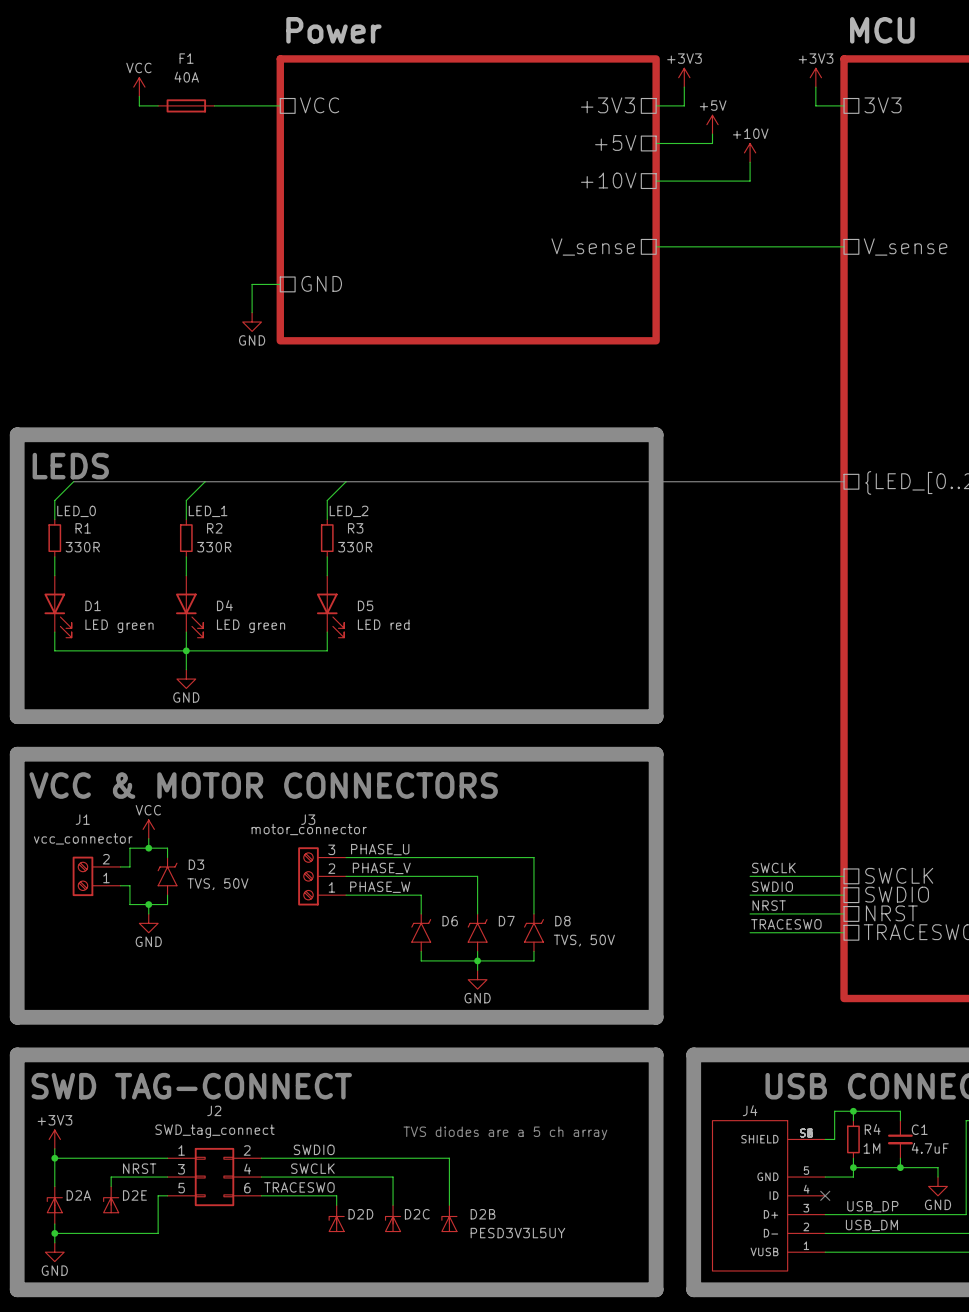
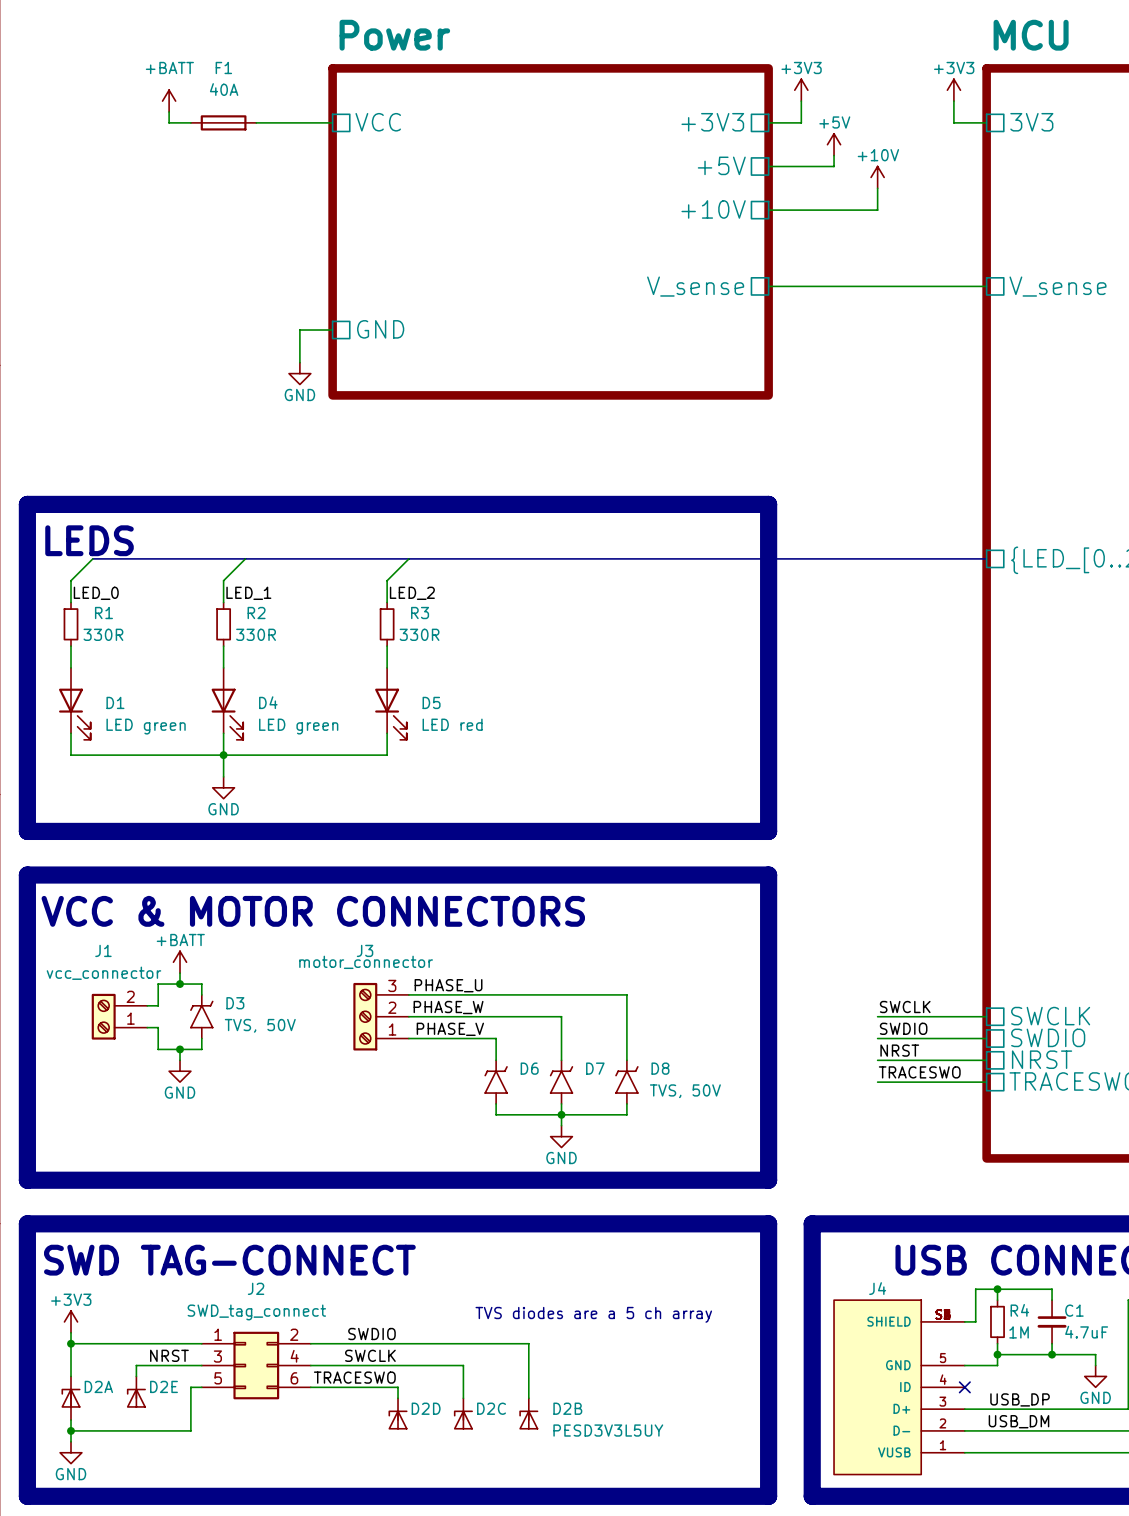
power symbol: VCC (139, 87) -> +BATT (169, 101)
power symbol: VCC (148, 829) -> +BATT (180, 962)
label: PHASE_V (381, 868) -> PHASE_W (448, 1007)
label: PHASE_W (380, 887) -> PHASE_V (450, 1029)

